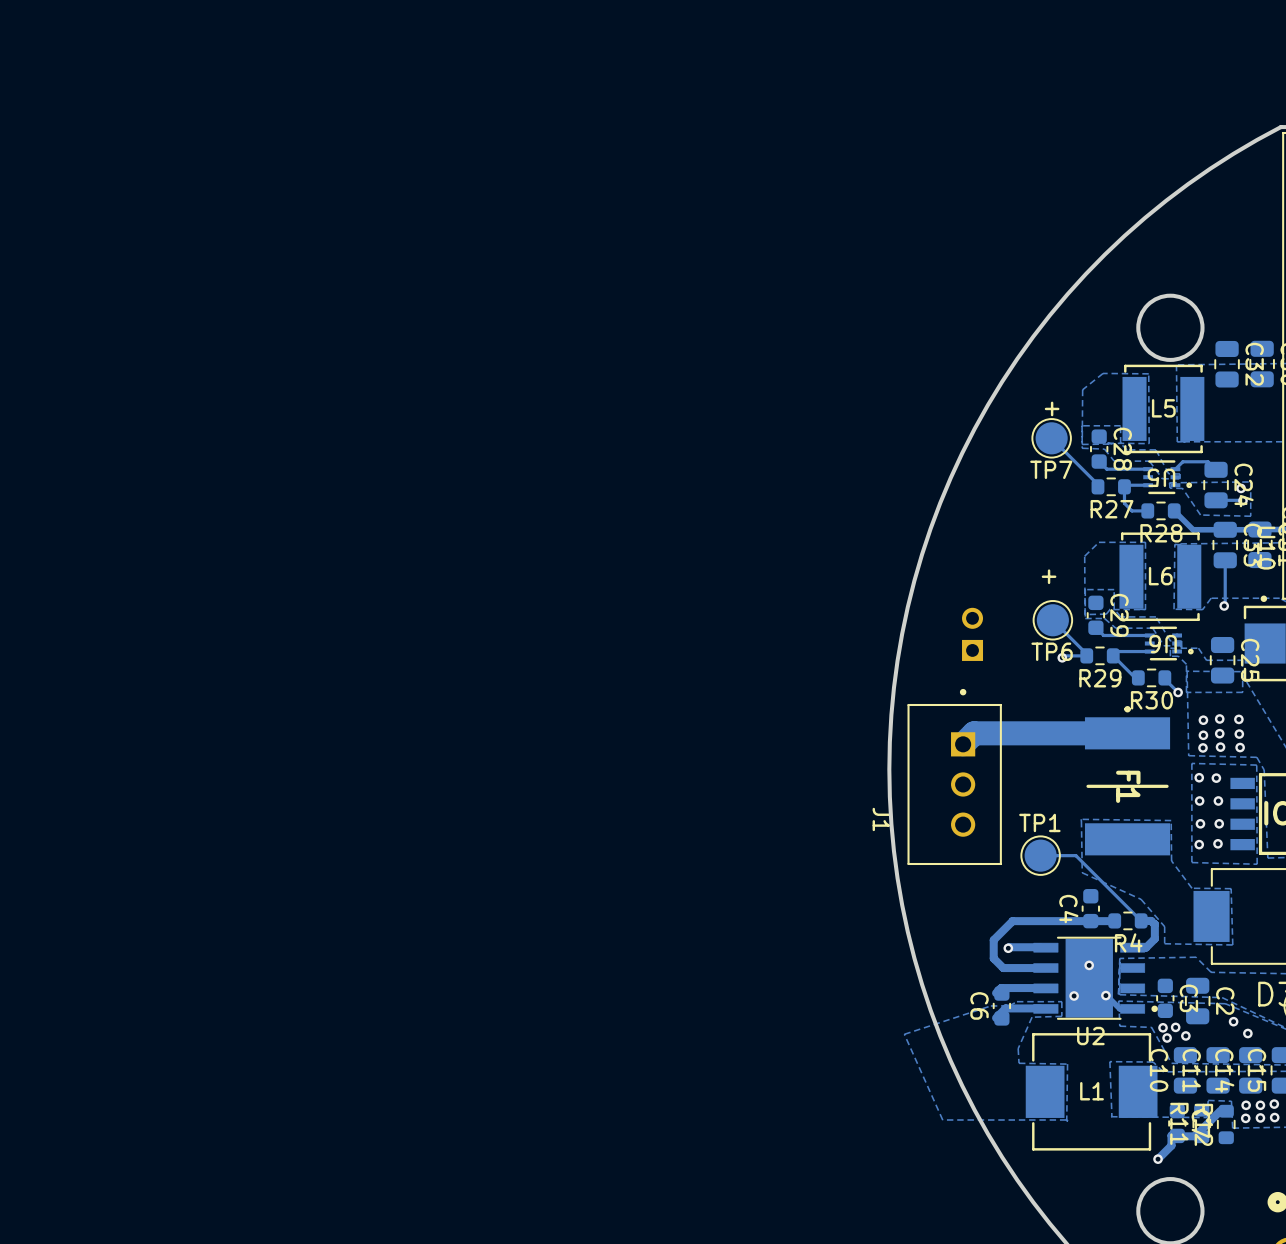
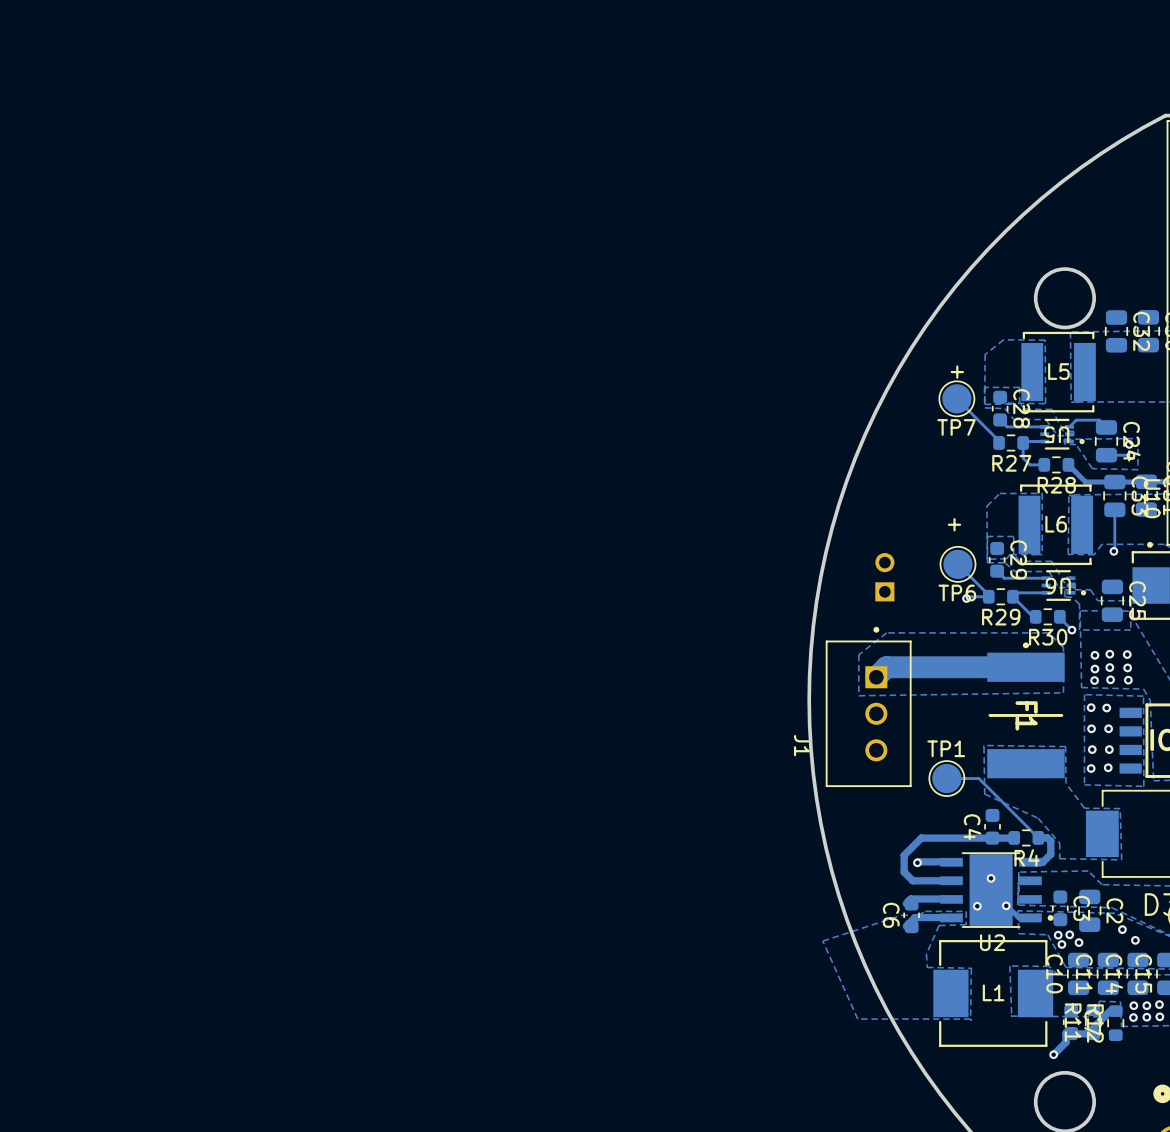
zone outline: none -> (1048, 632) (1063, 647) (1063, 692) (858, 695) (858, 654) (886, 632) (1048, 632)

